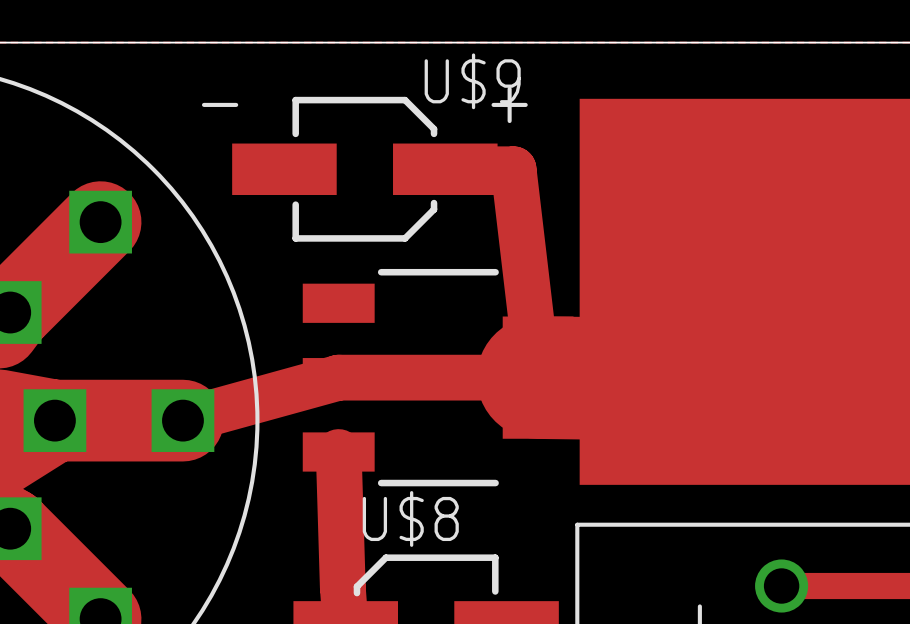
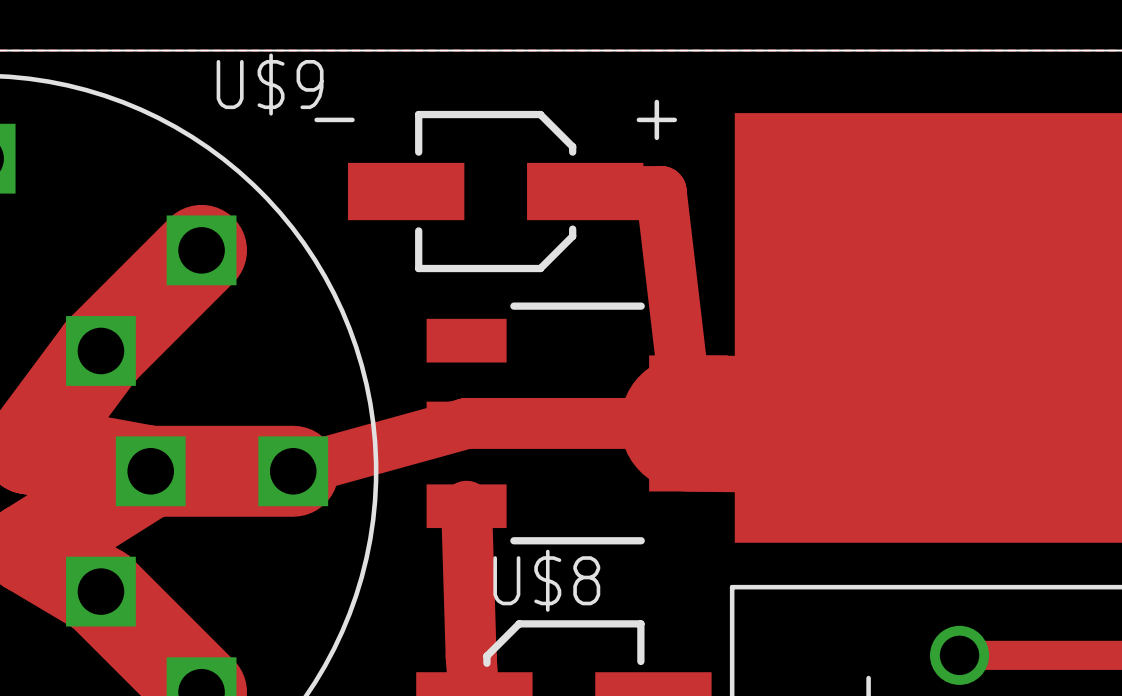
U$9 name position: U$9 (472, 81) -> U$9 (270, 84)

